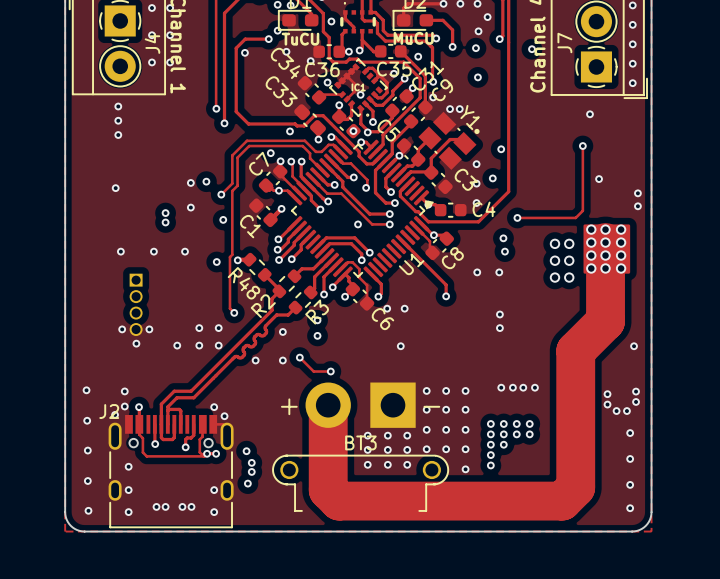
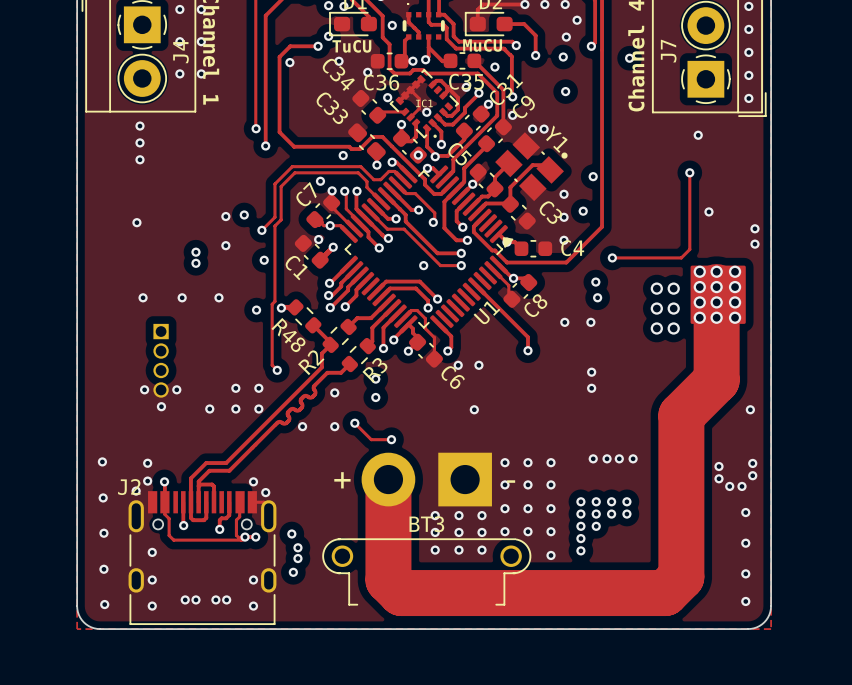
via: none -> (318, 239)

